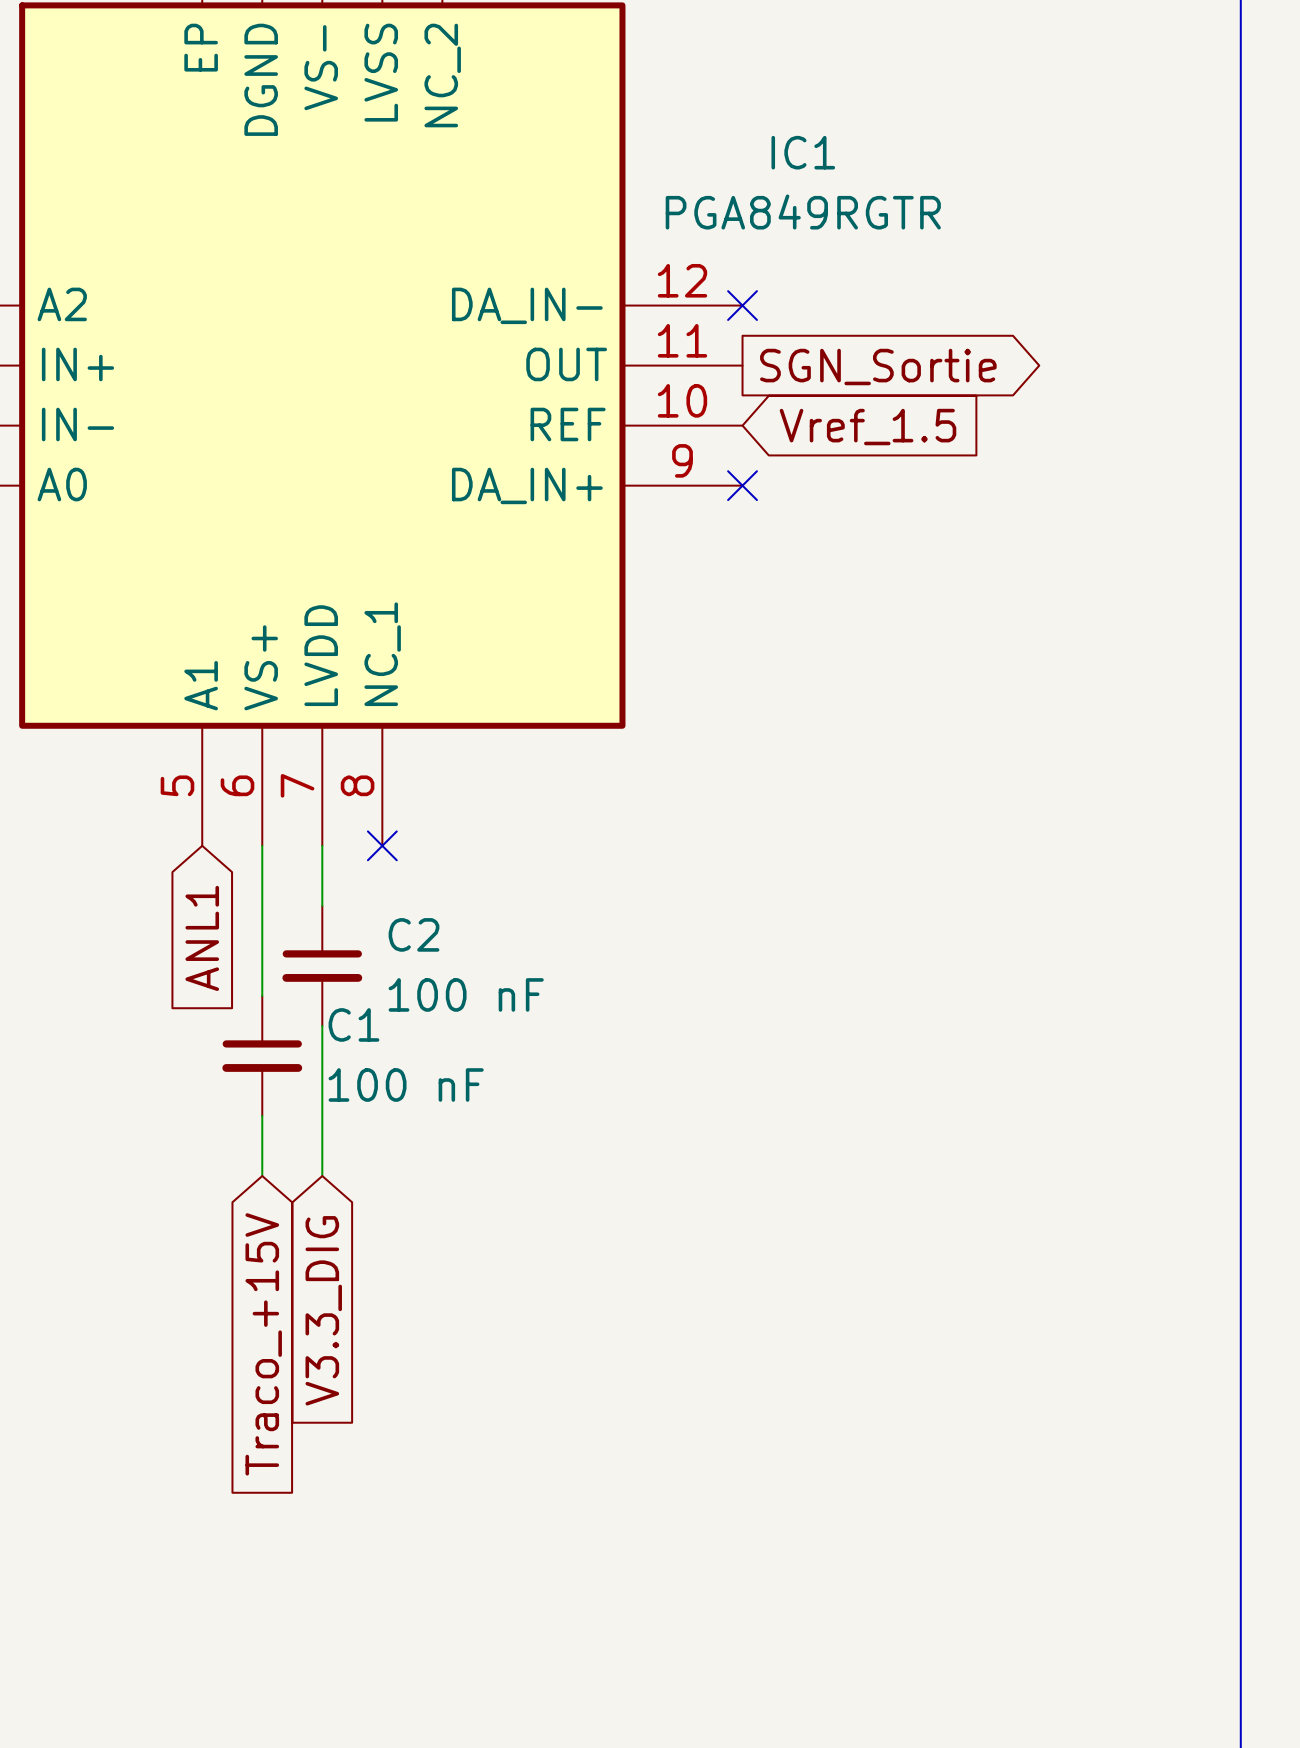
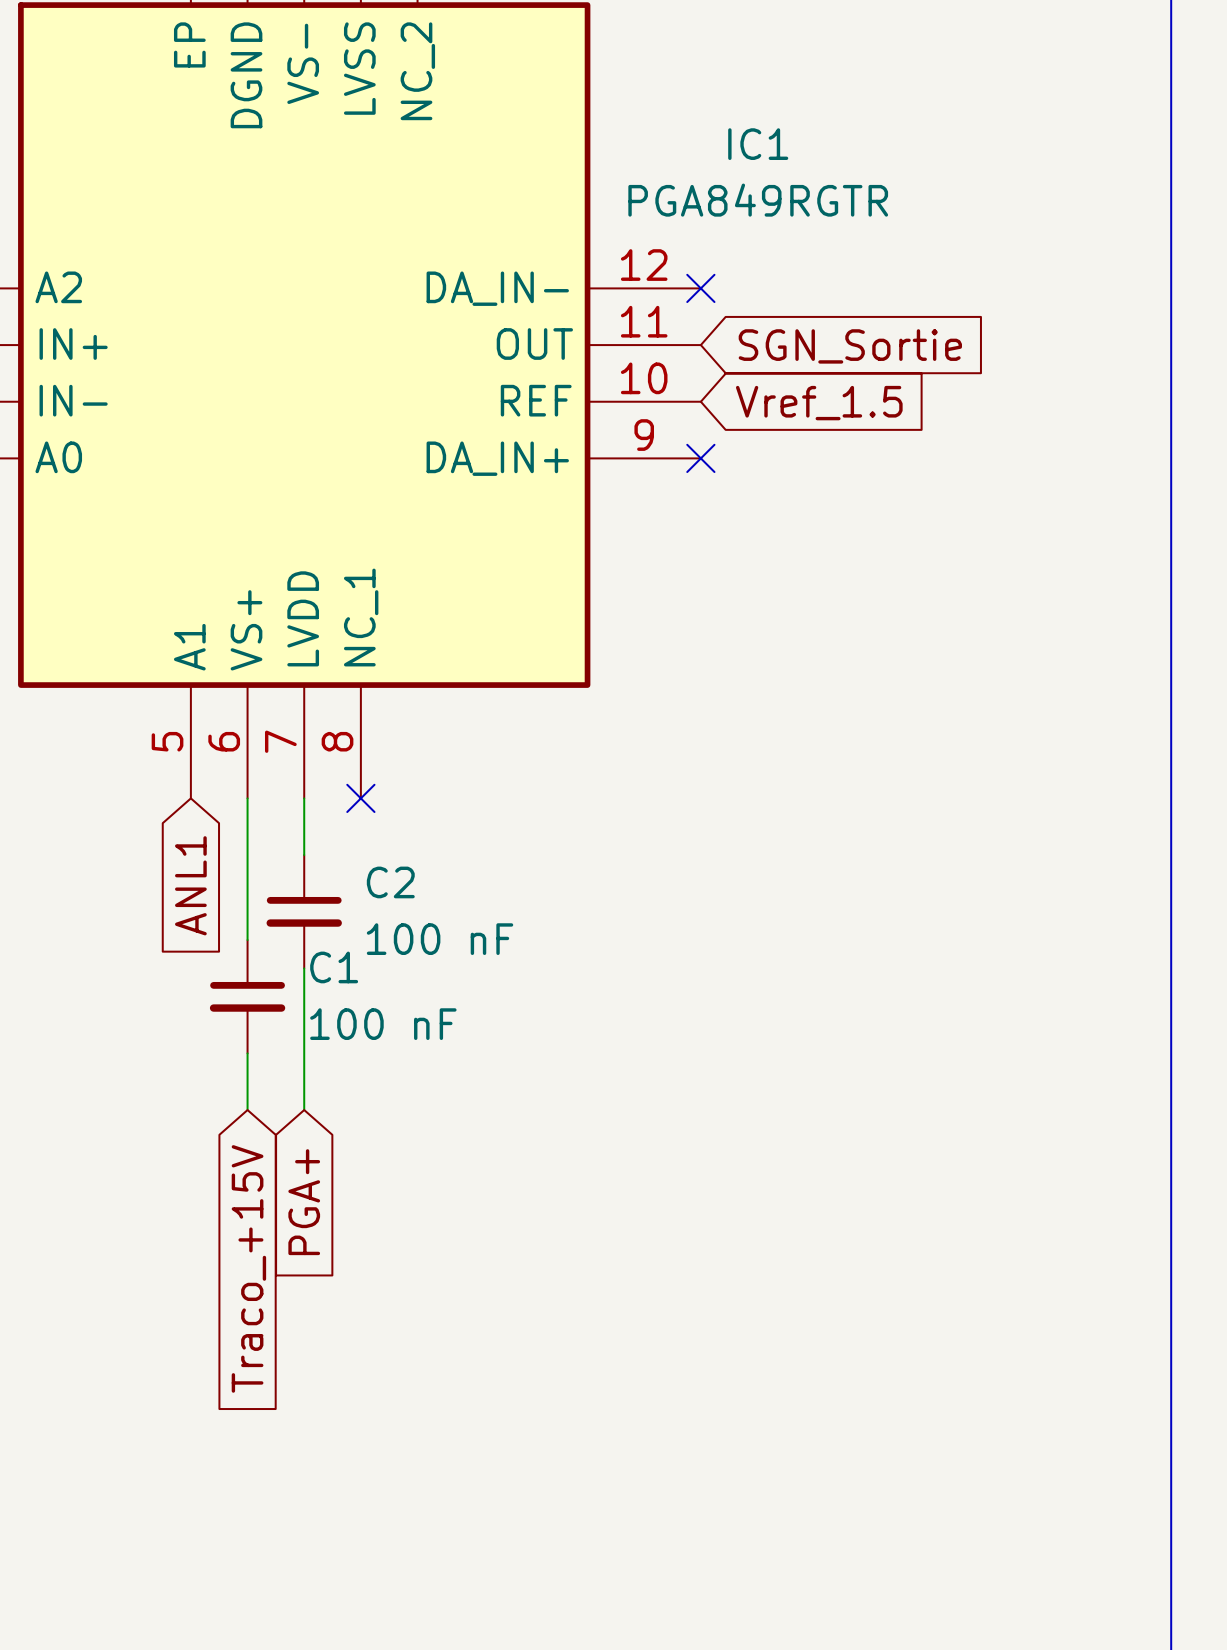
global label shape: output (878, 367) -> input (850, 346)
global label: V3.3_DIG (323, 1310) -> PGA+ (304, 1202)

